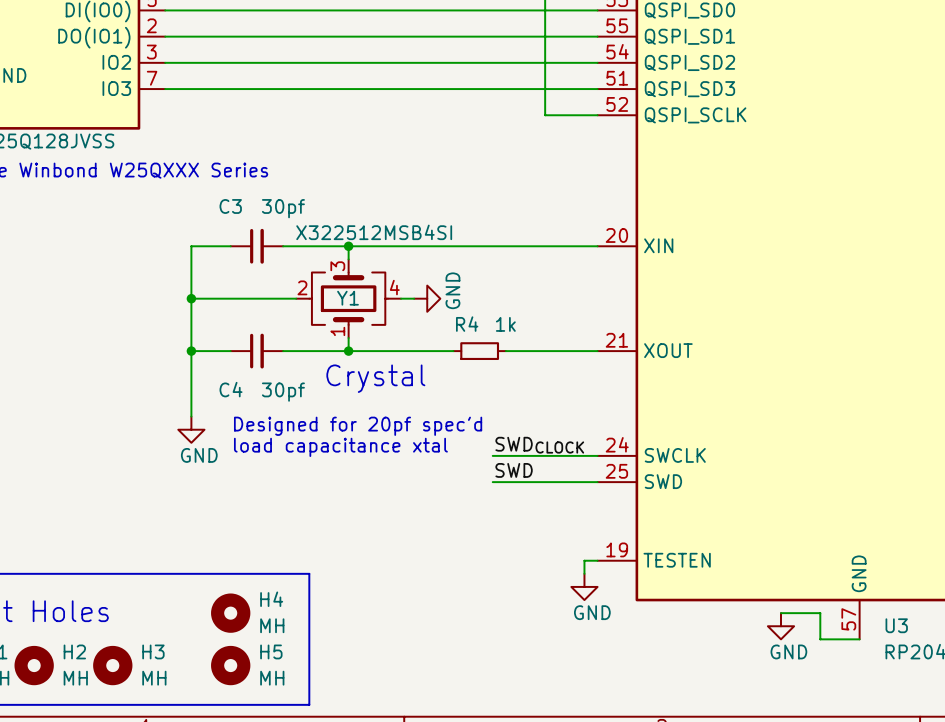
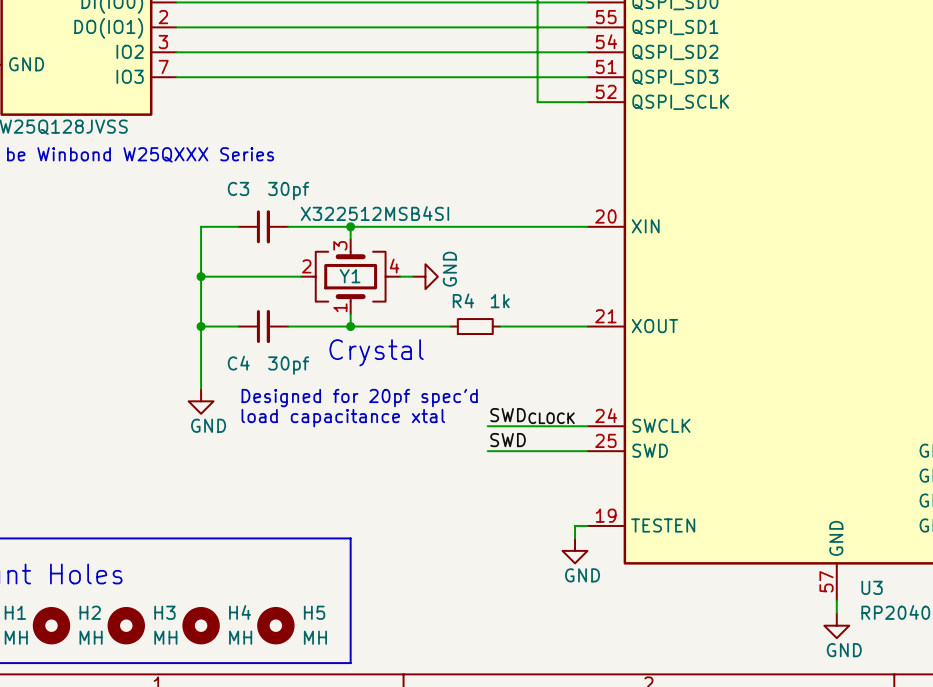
line: (309, 573) (309, 704) -> (313, 538) (350, 538) (350, 663) (313, 663)
H4 position: (230, 613) -> (201, 625)
wire: (781, 613) (820, 613) (820, 639) (859, 639) -> (836, 613) (836, 600)
power symbol position: GND (781, 626) -> GND (836, 625)
H5 position: (230, 665) -> (275, 625)

